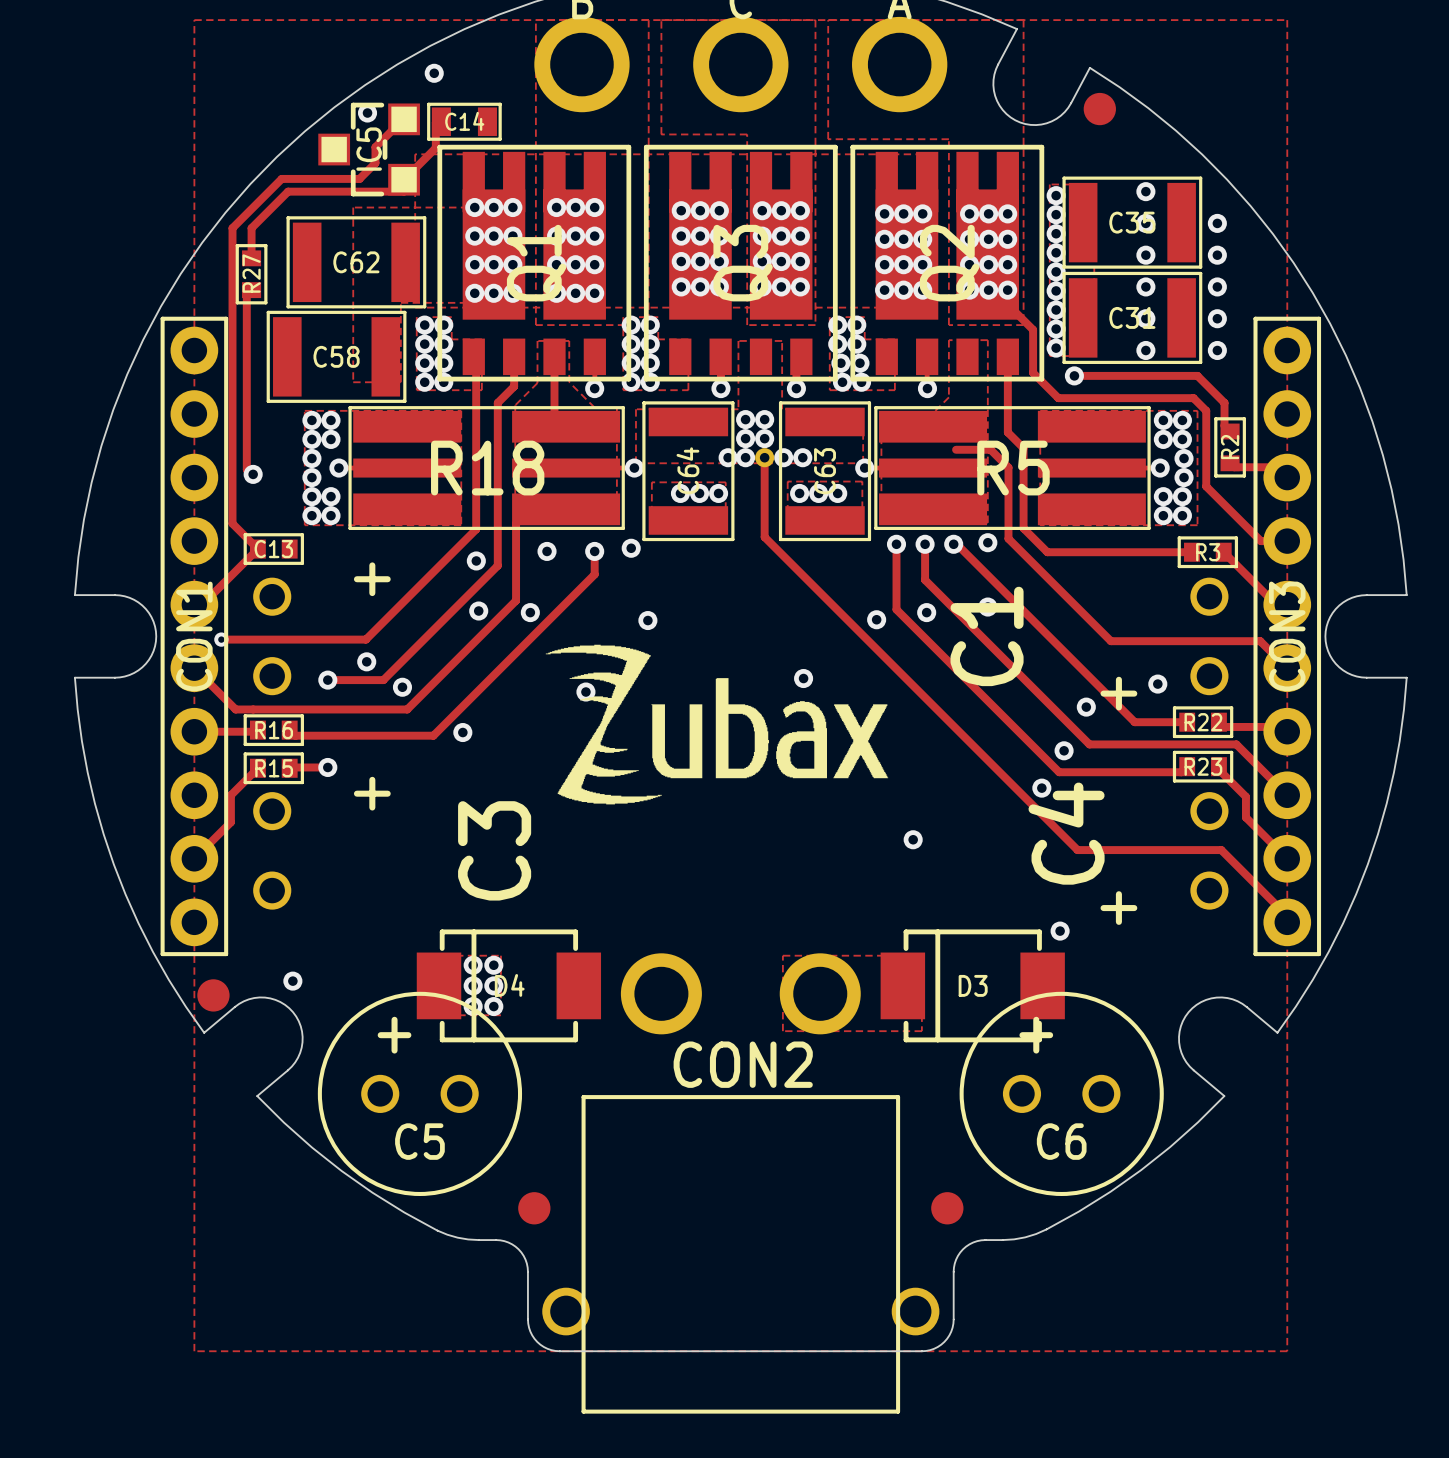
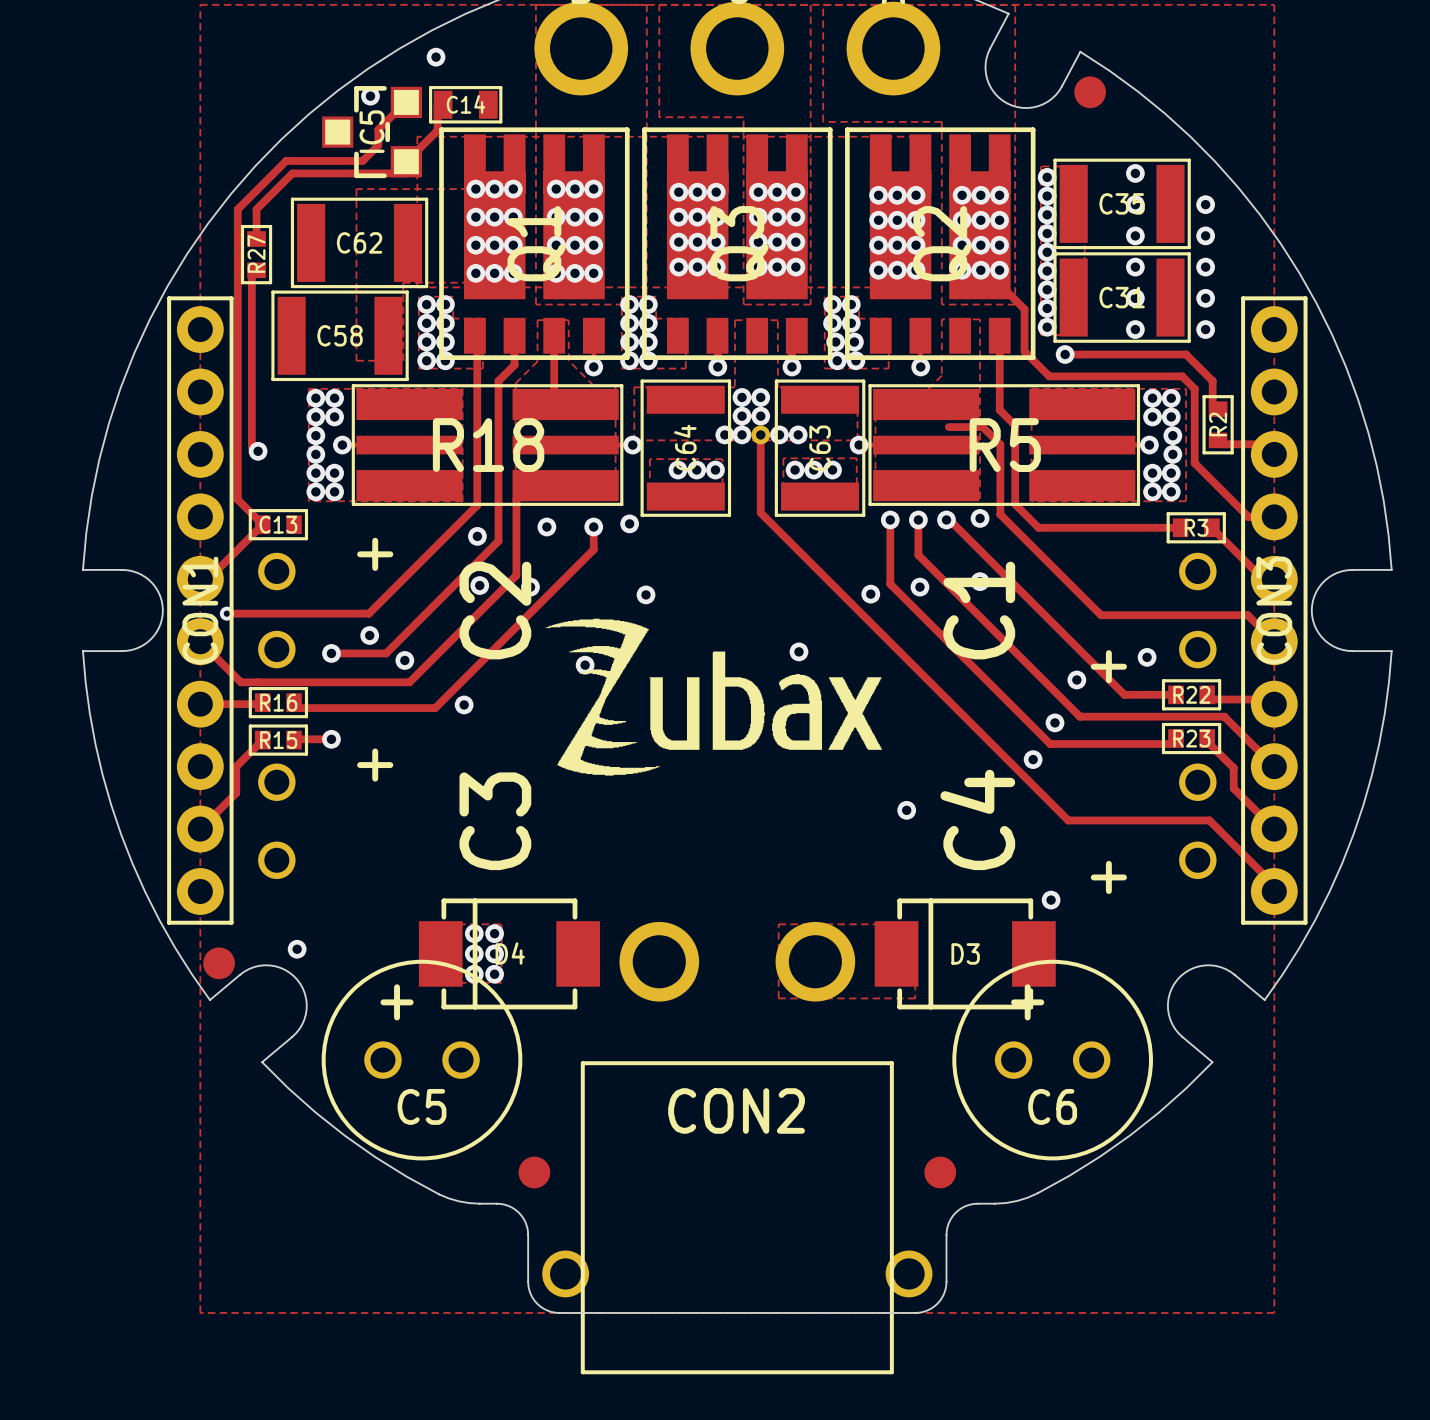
C2 name: none -> C2 (495, 610)
C4 name position: C4 (1066, 833) -> C4 (977, 819)
CON2 name position: CON2 (743, 1064) -> CON2 (736, 1110)

